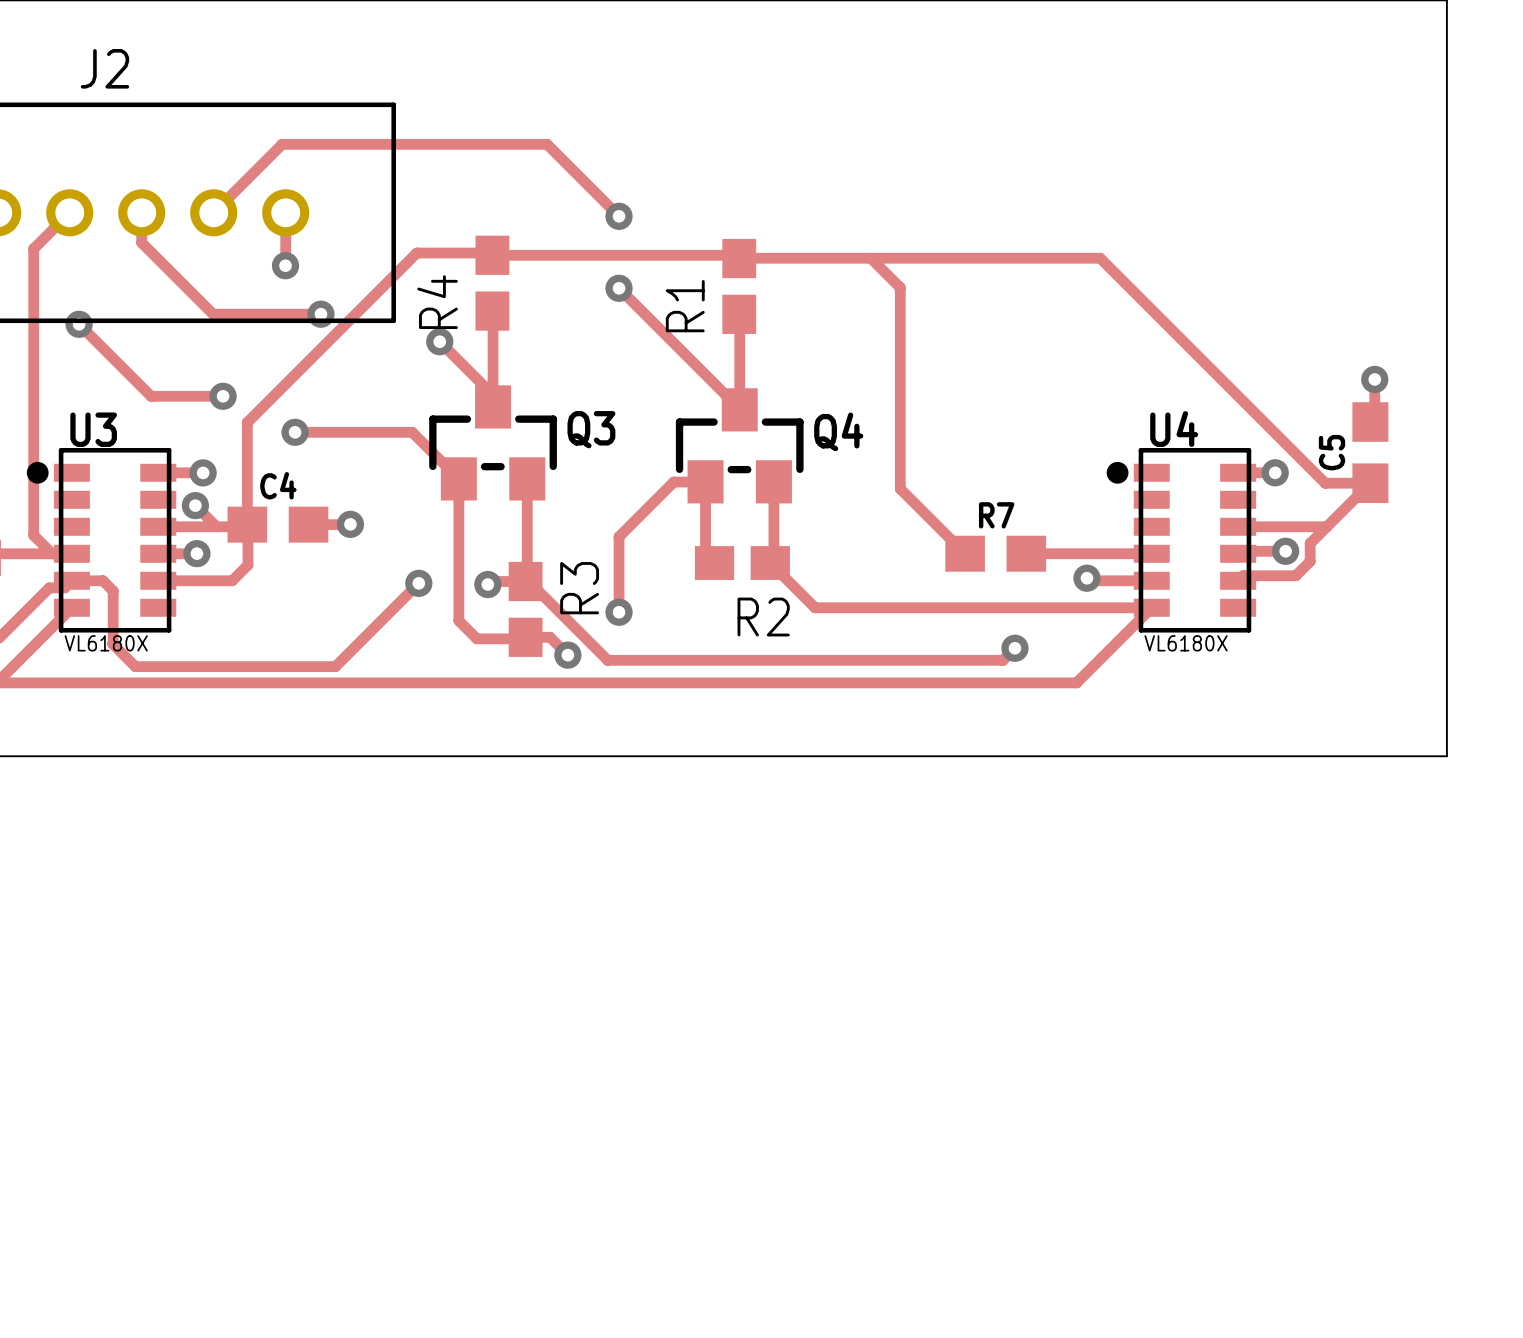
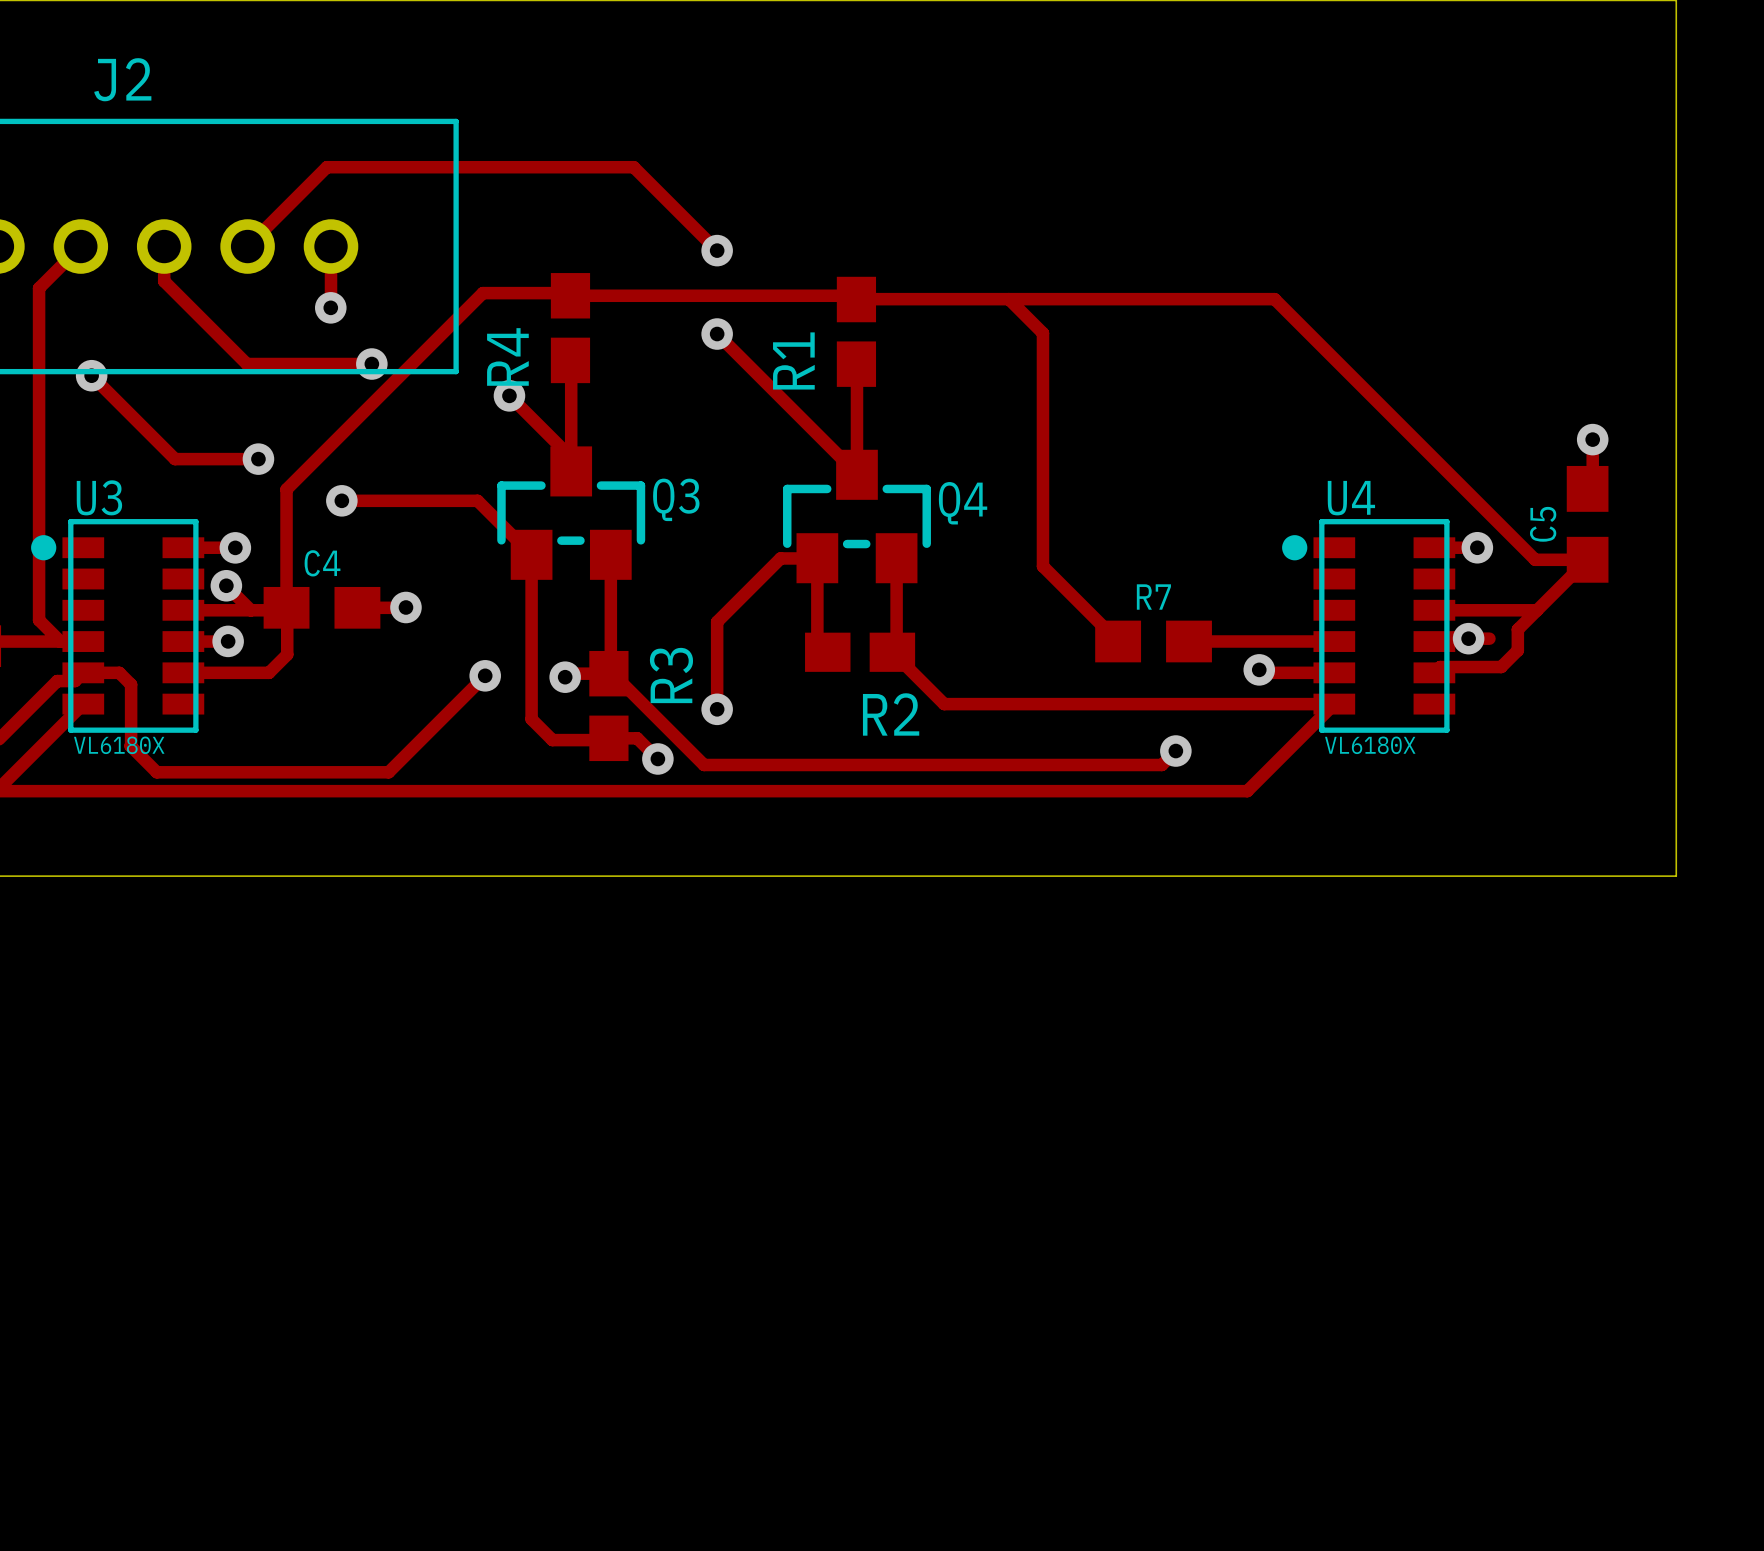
via position: (1285, 551) -> (1468, 638)

